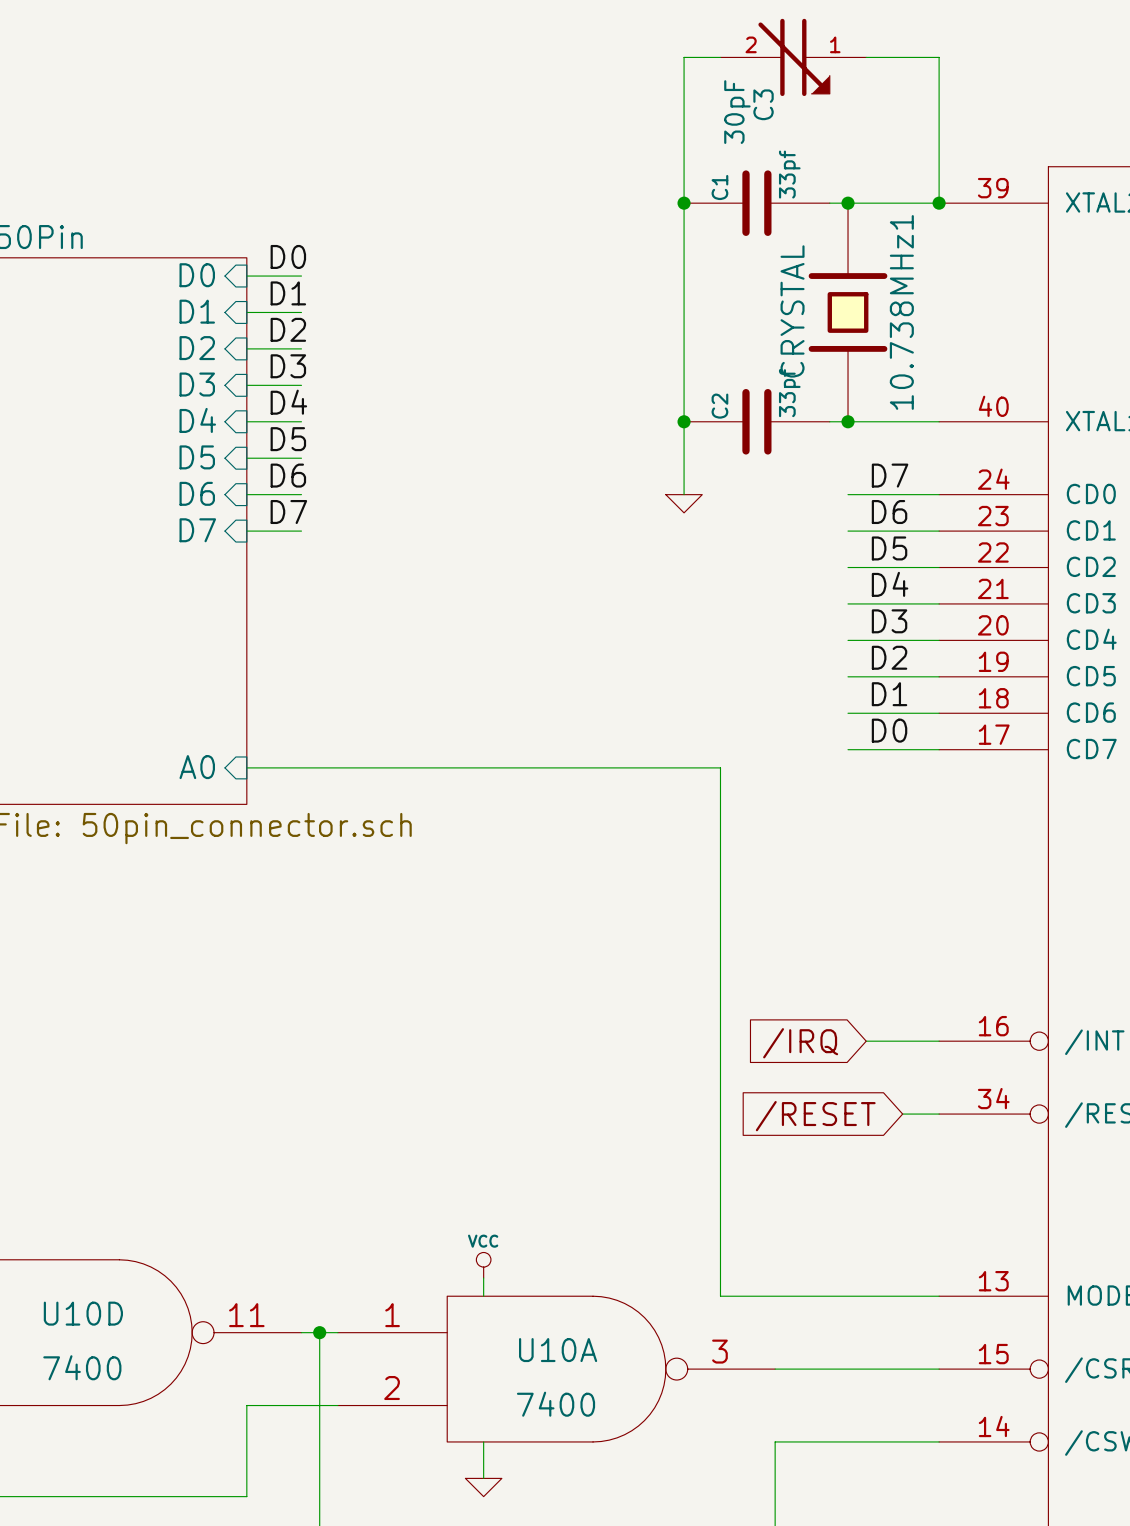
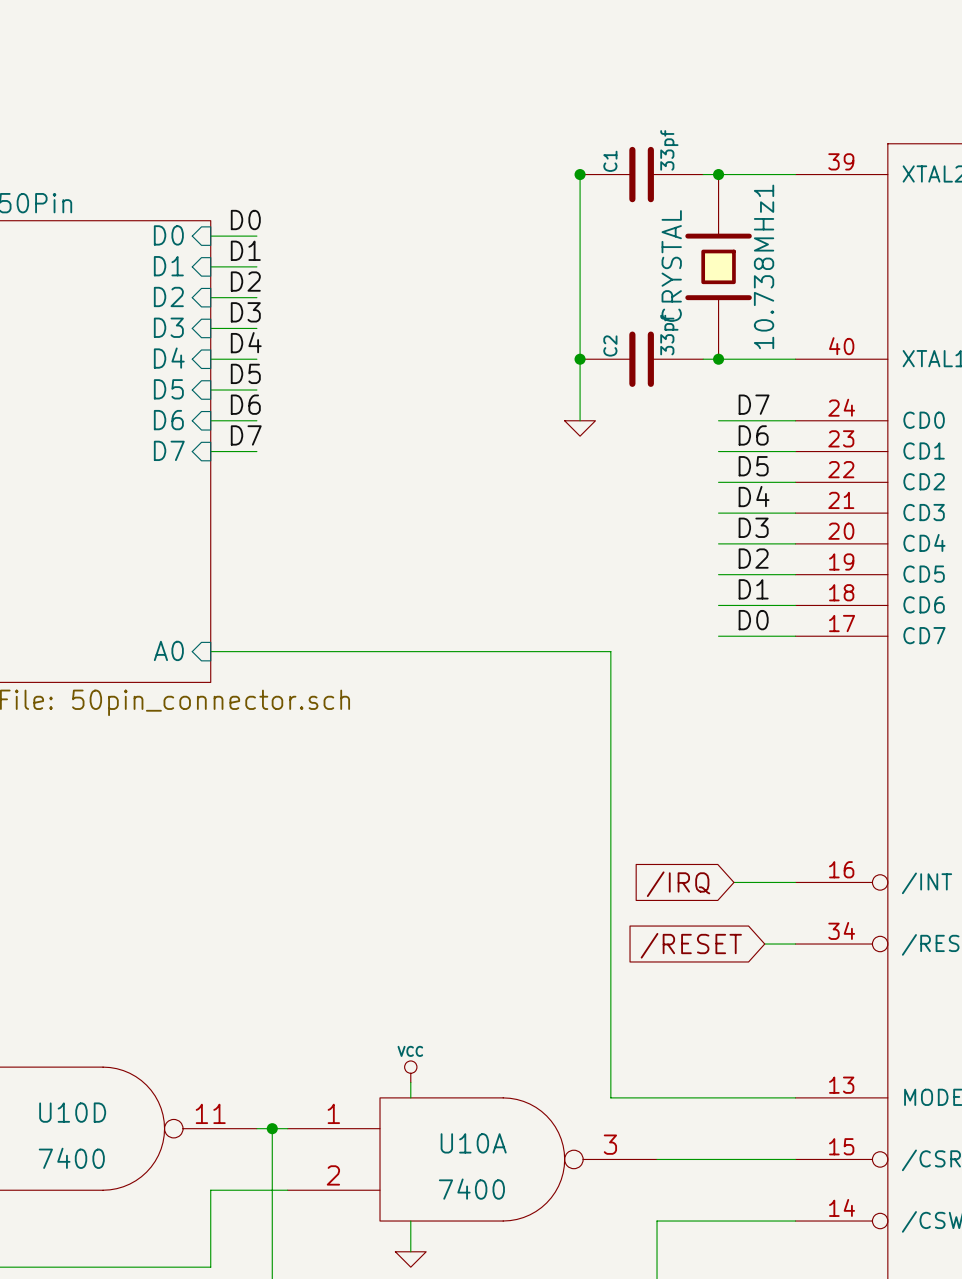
wire: (720, 57) (684, 57) (684, 203) -> none
C3: 30pF (793, 57) -> none
wire: (866, 57) (939, 57) (939, 203) -> none
junction: (939, 203) -> none

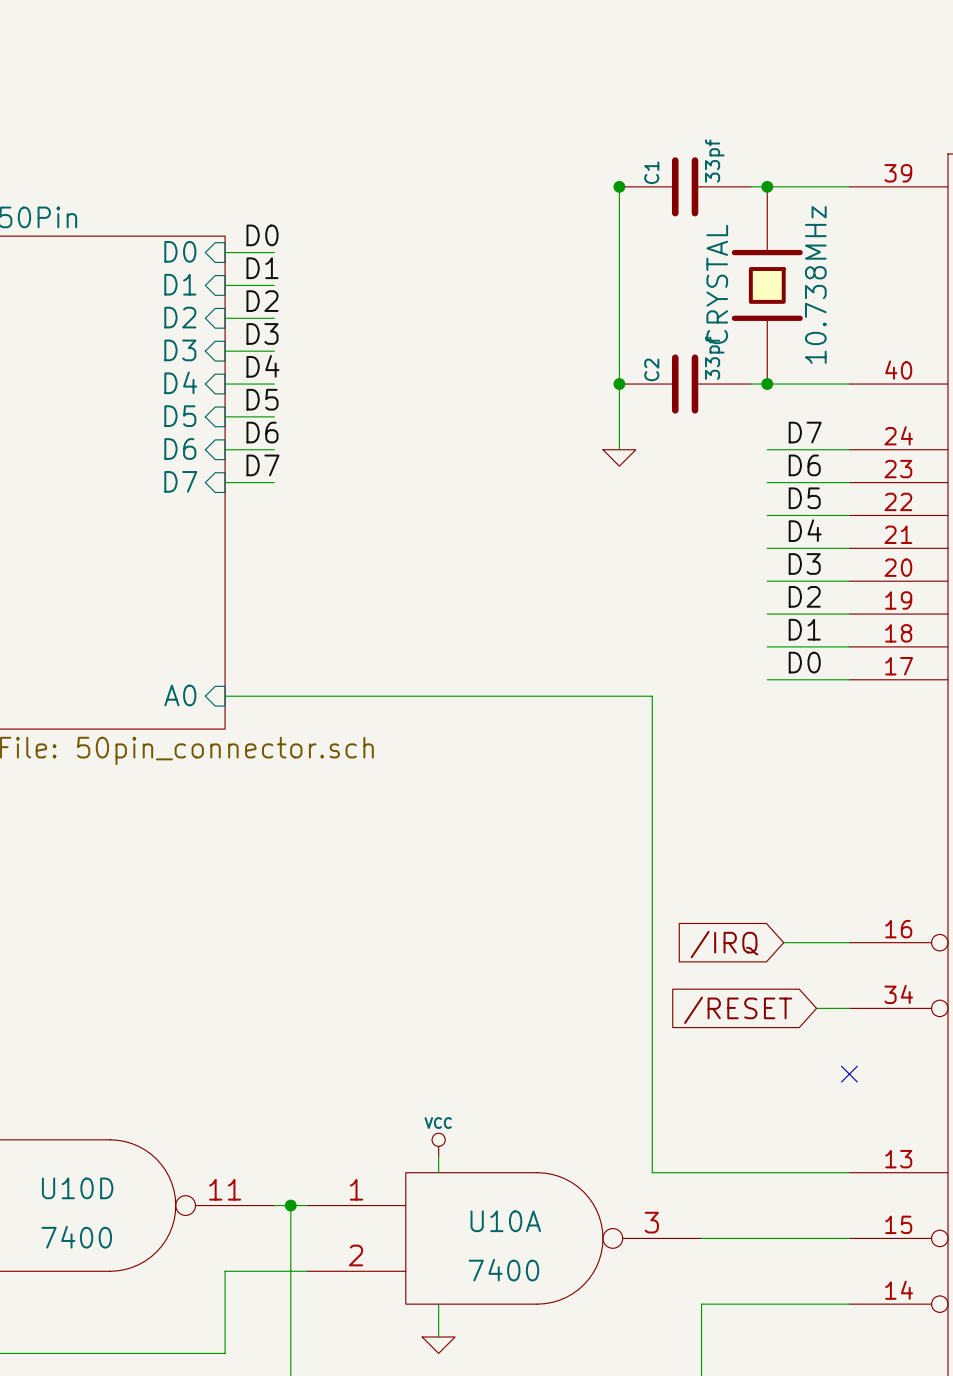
10.738MHz1 name: 10.738MHz1 (764, 266) -> 10.738MHz (815, 284)
no-connect mark: none -> (849, 1074)

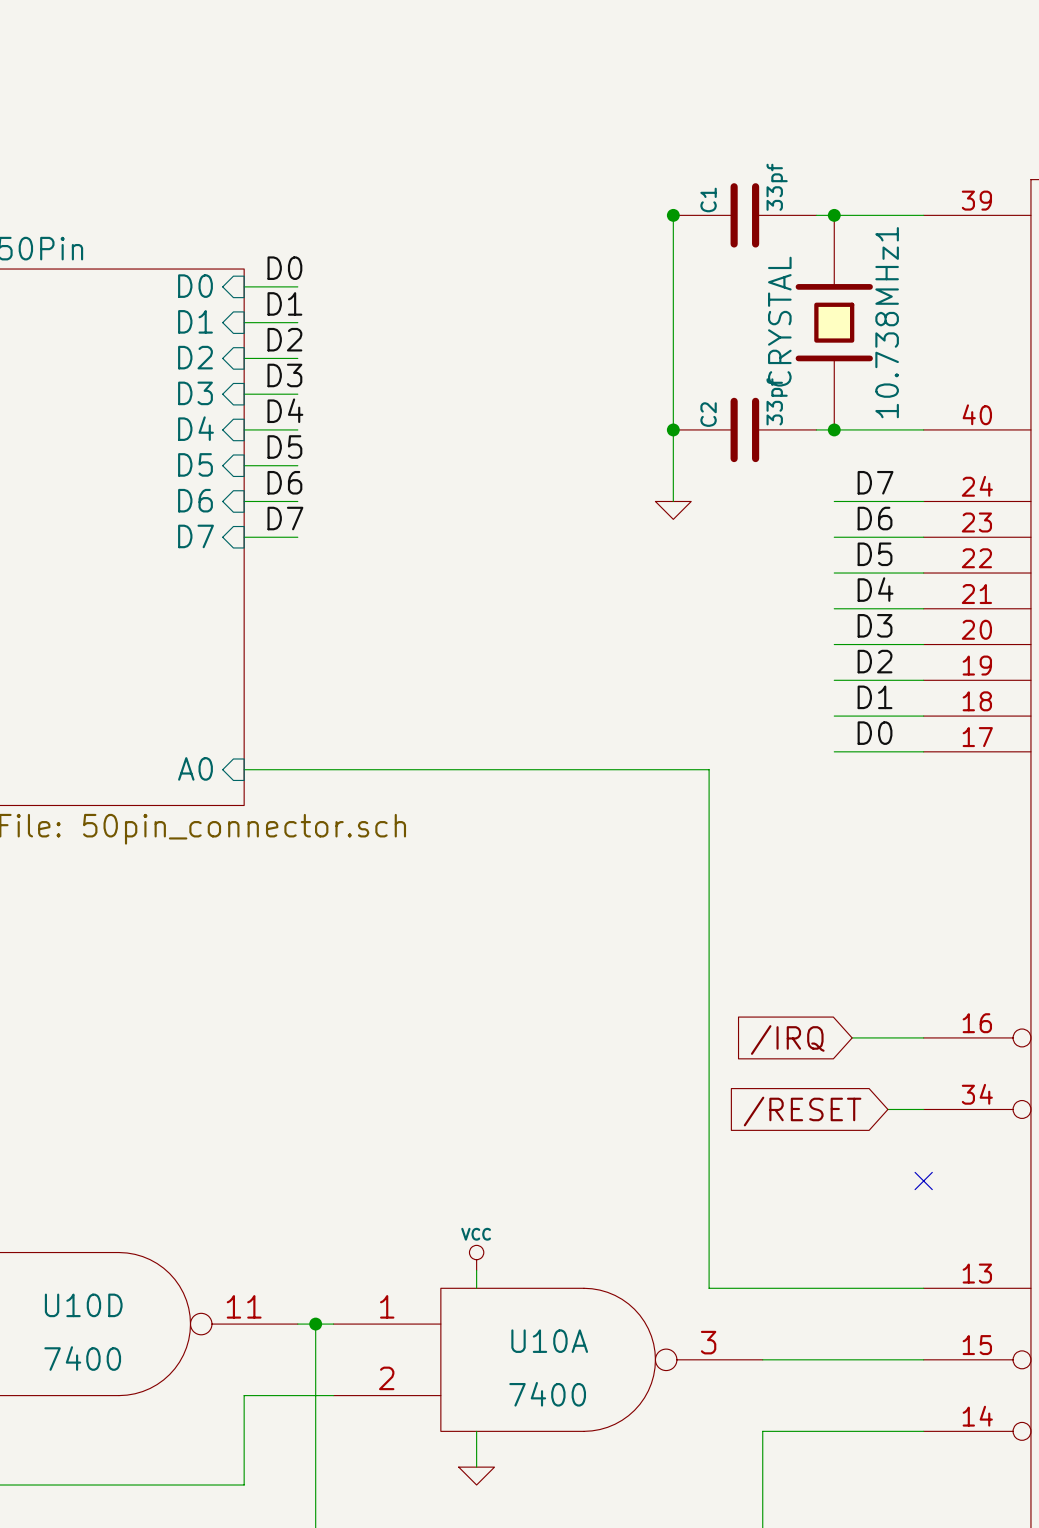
10.738MHz name: 10.738MHz (815, 284) -> 10.738MHz1 (887, 322)

